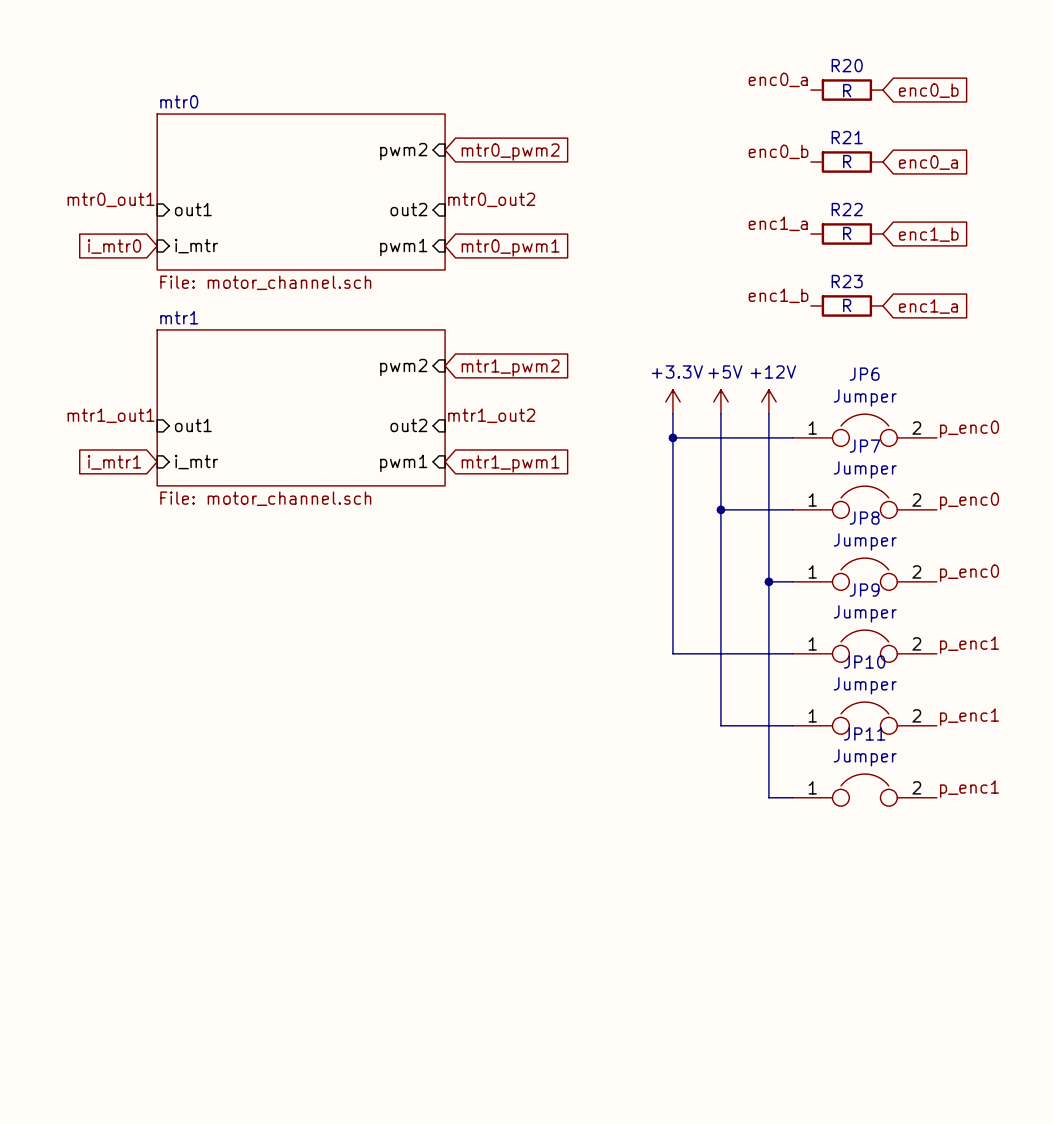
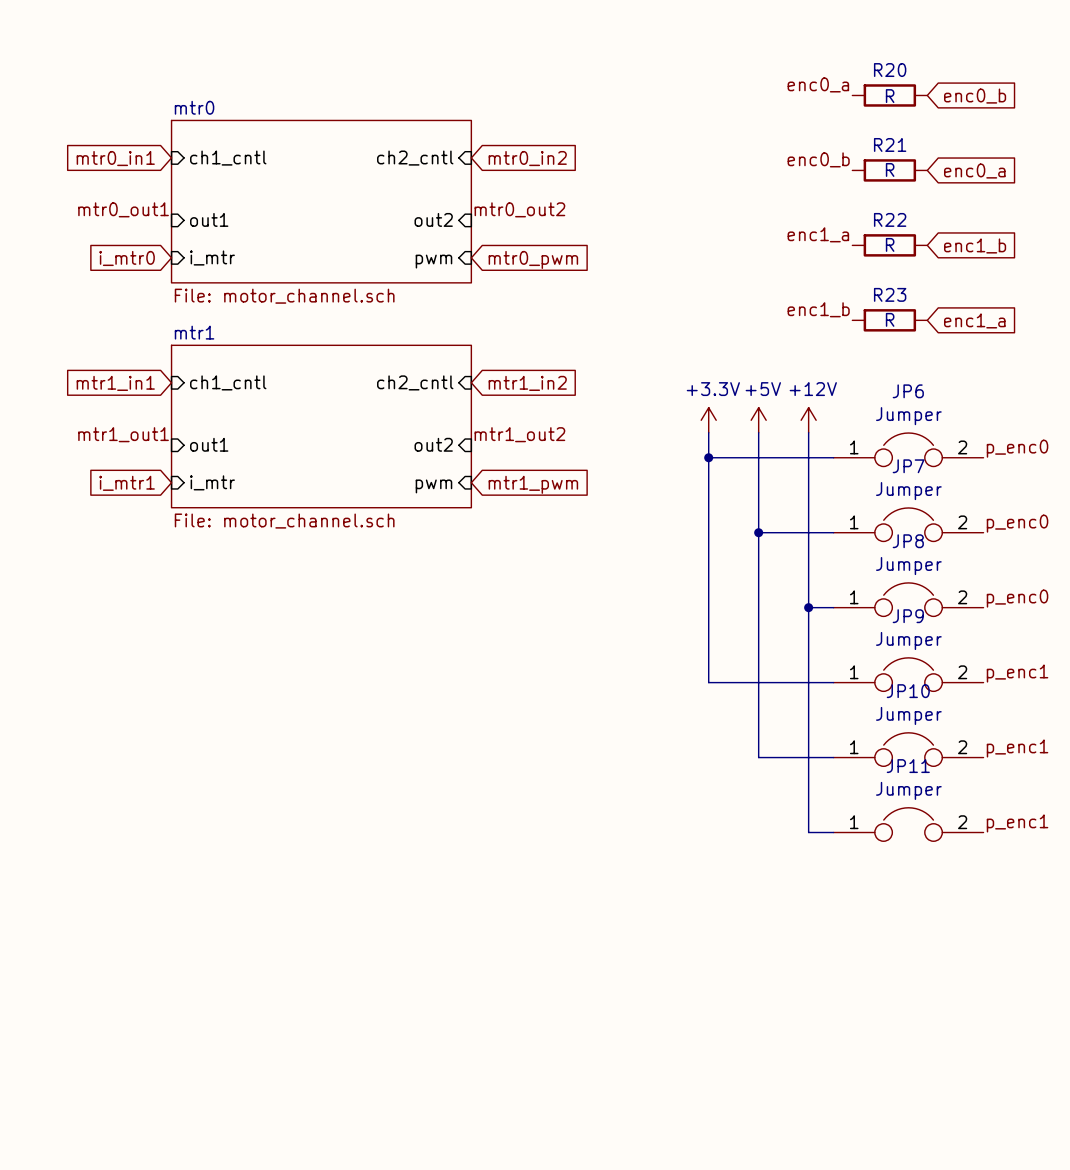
global label: none -> mtr0_in1 (115, 158)
sheet pin: none -> ch1_cntl (228, 158)
sheet pin: pwm2 (403, 151) -> ch2_cntl (415, 158)
global label: mtr0_pwm2 (510, 152) -> mtr0_in2 (527, 158)
sheet pin: pwm1 (403, 247) -> pwm (433, 261)
global label: mtr0_pwm1 (510, 247) -> mtr0_pwm (533, 259)
global label: none -> mtr1_in1 (115, 383)
sheet pin: none -> ch1_cntl (228, 382)
sheet pin: pwm2 (403, 367) -> ch2_cntl (415, 382)
global label: mtr1_pwm2 (510, 367) -> mtr1_in2 (527, 383)
sheet pin: pwm1 (403, 463) -> pwm (433, 486)
global label: mtr1_pwm1 (510, 463) -> mtr1_pwm (533, 484)

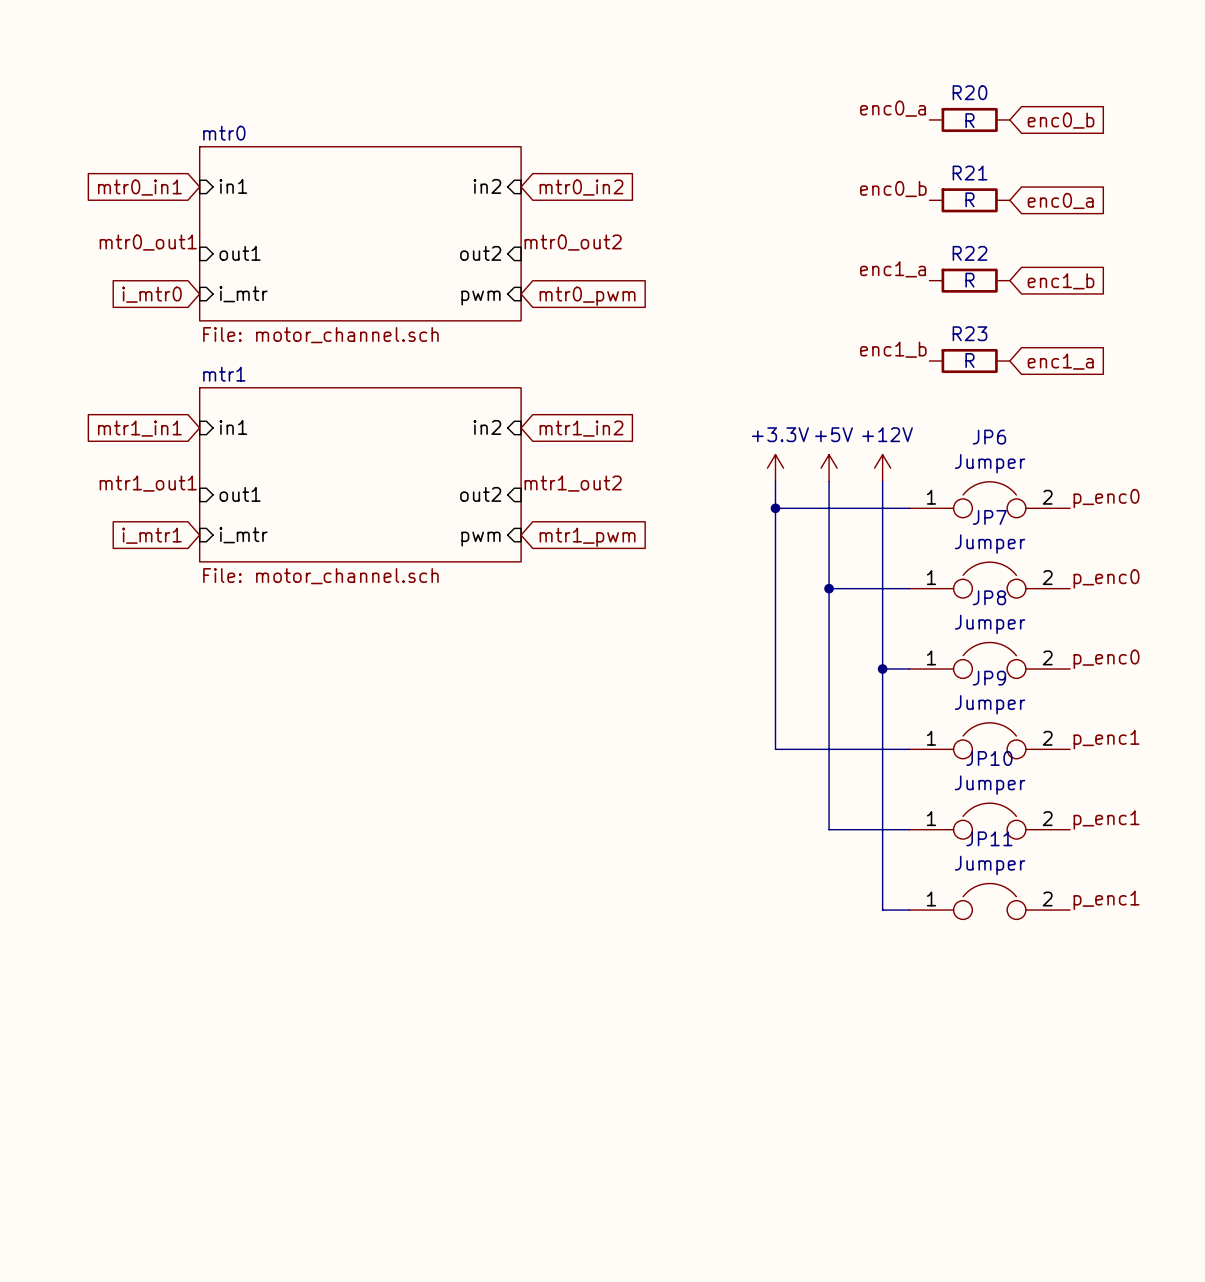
sheet pin: ch1_cntl (228, 158) -> in1 (233, 186)
sheet pin: ch2_cntl (415, 158) -> in2 (487, 186)
sheet pin: ch1_cntl (228, 382) -> in1 (233, 427)
sheet pin: ch2_cntl (415, 382) -> in2 (487, 427)

